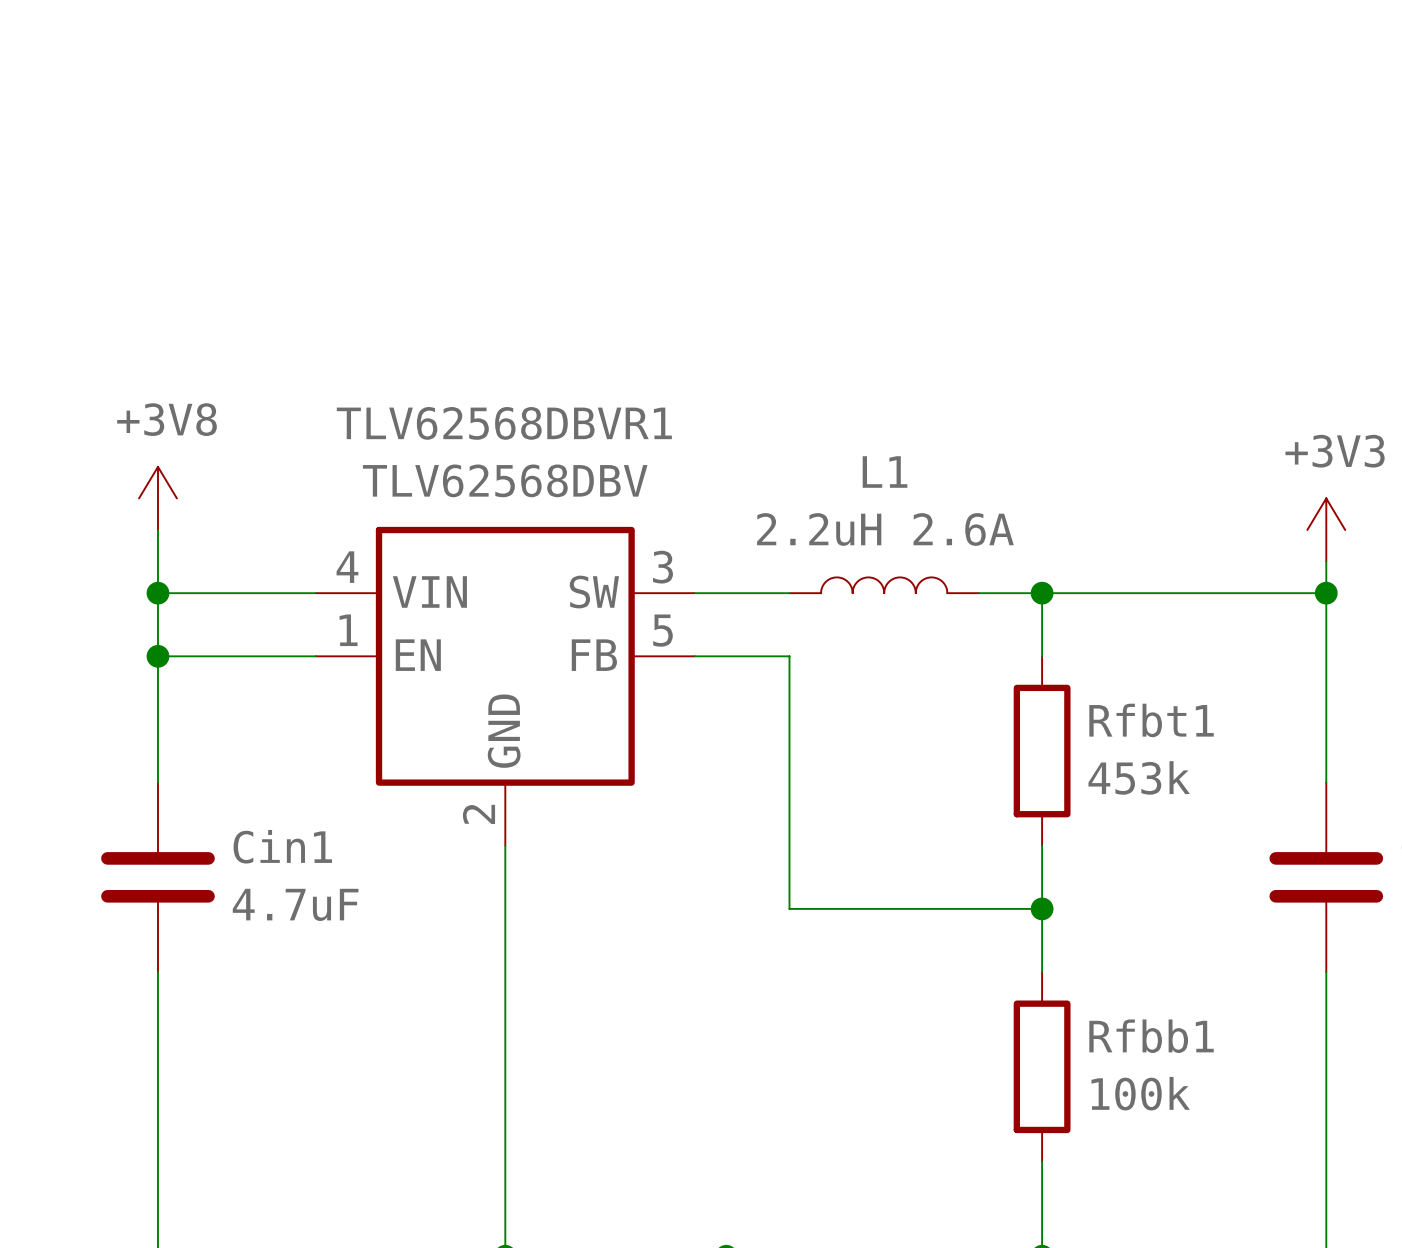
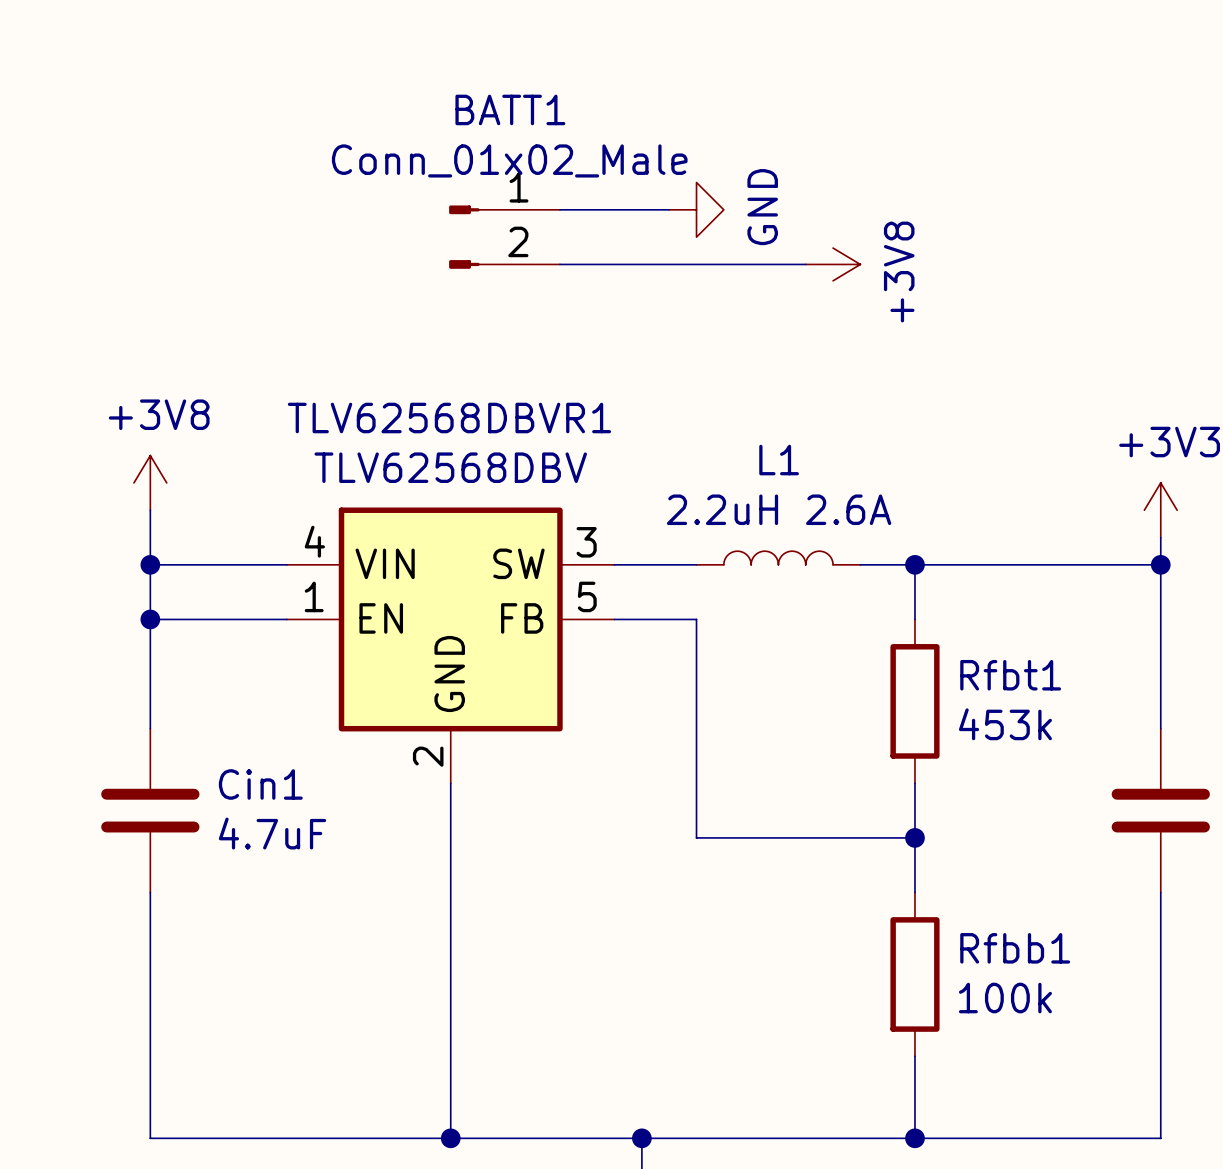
wire: none -> (559, 209) (669, 209)
power symbol: none -> GND (696, 209)
BATT1: none -> Conn_01x02_Male (504, 237)
wire: none -> (559, 264) (805, 264)
power symbol: none -> +3V8 (833, 264)

